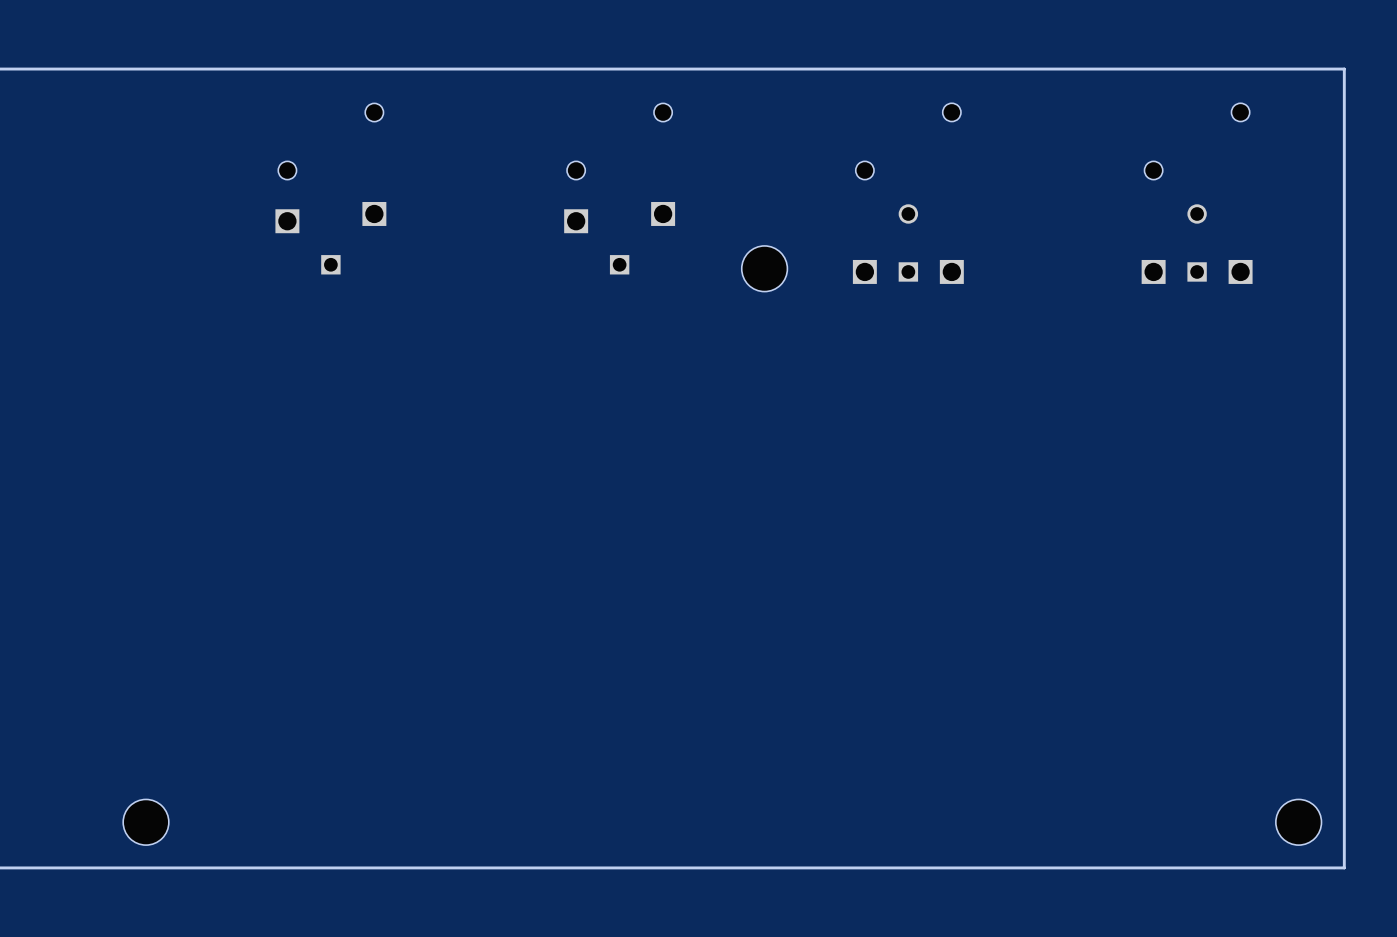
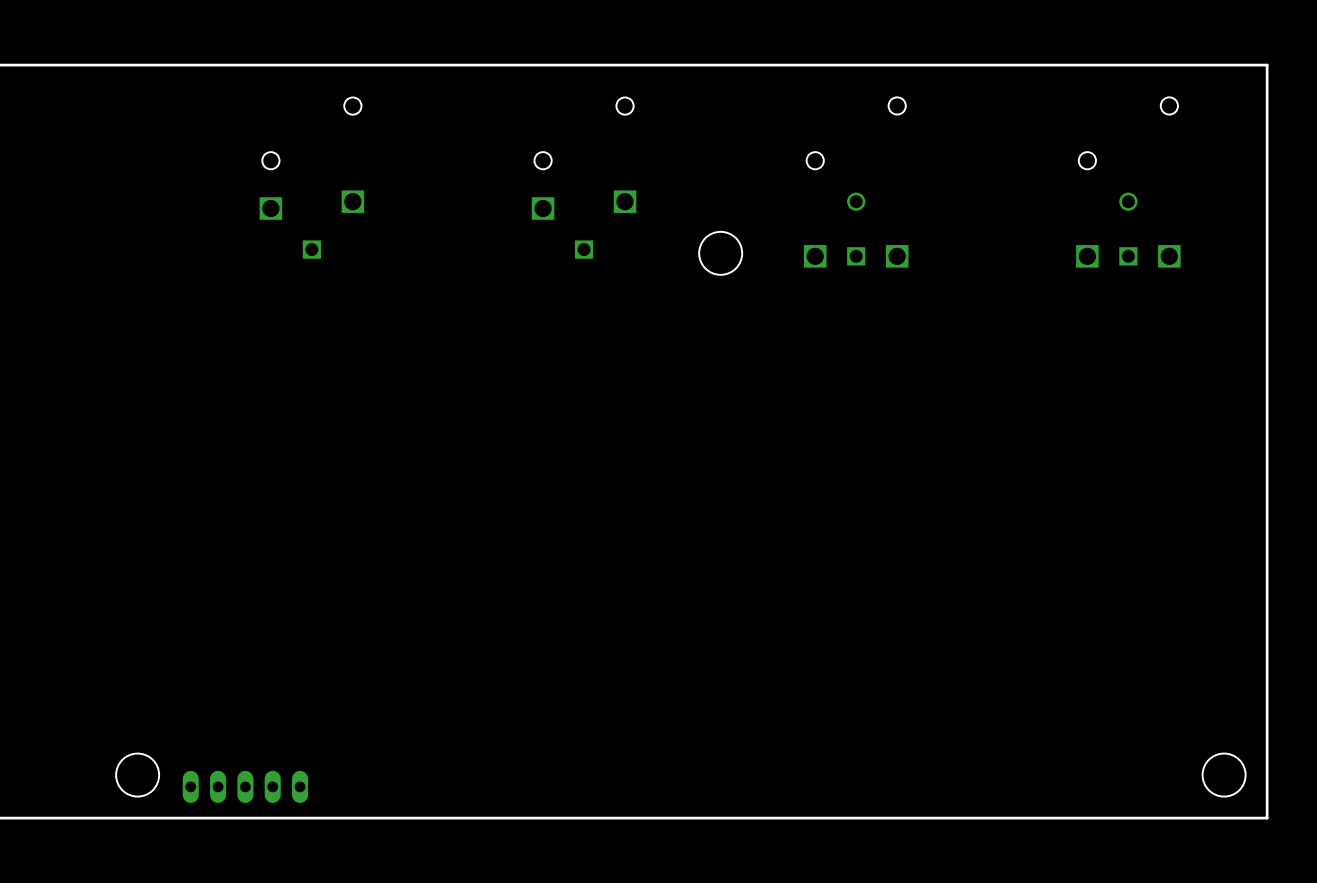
part: none -> (190, 786)
part: none -> (218, 786)
part: none -> (245, 786)
part: none -> (272, 786)
part: none -> (300, 786)

